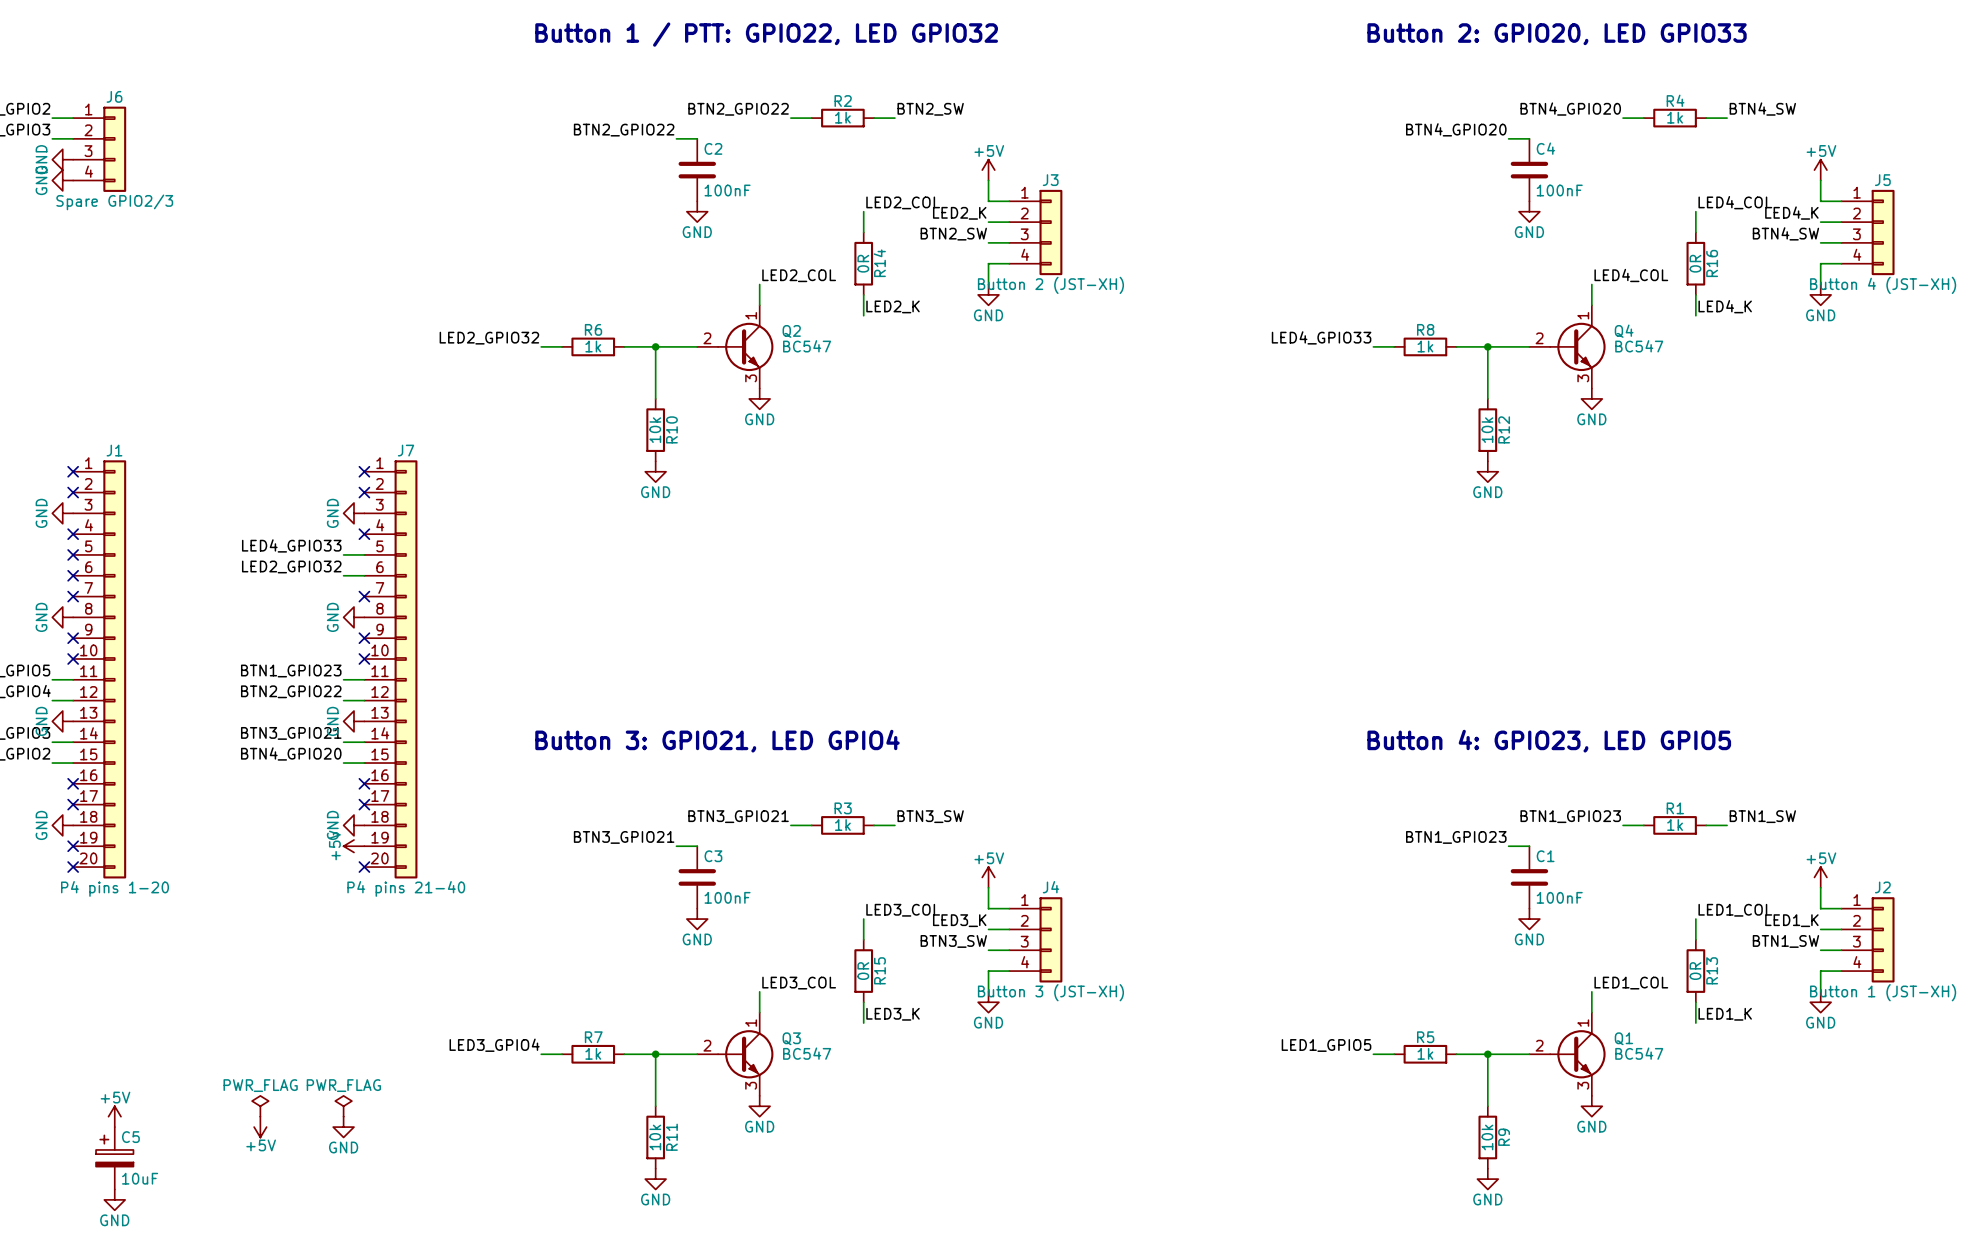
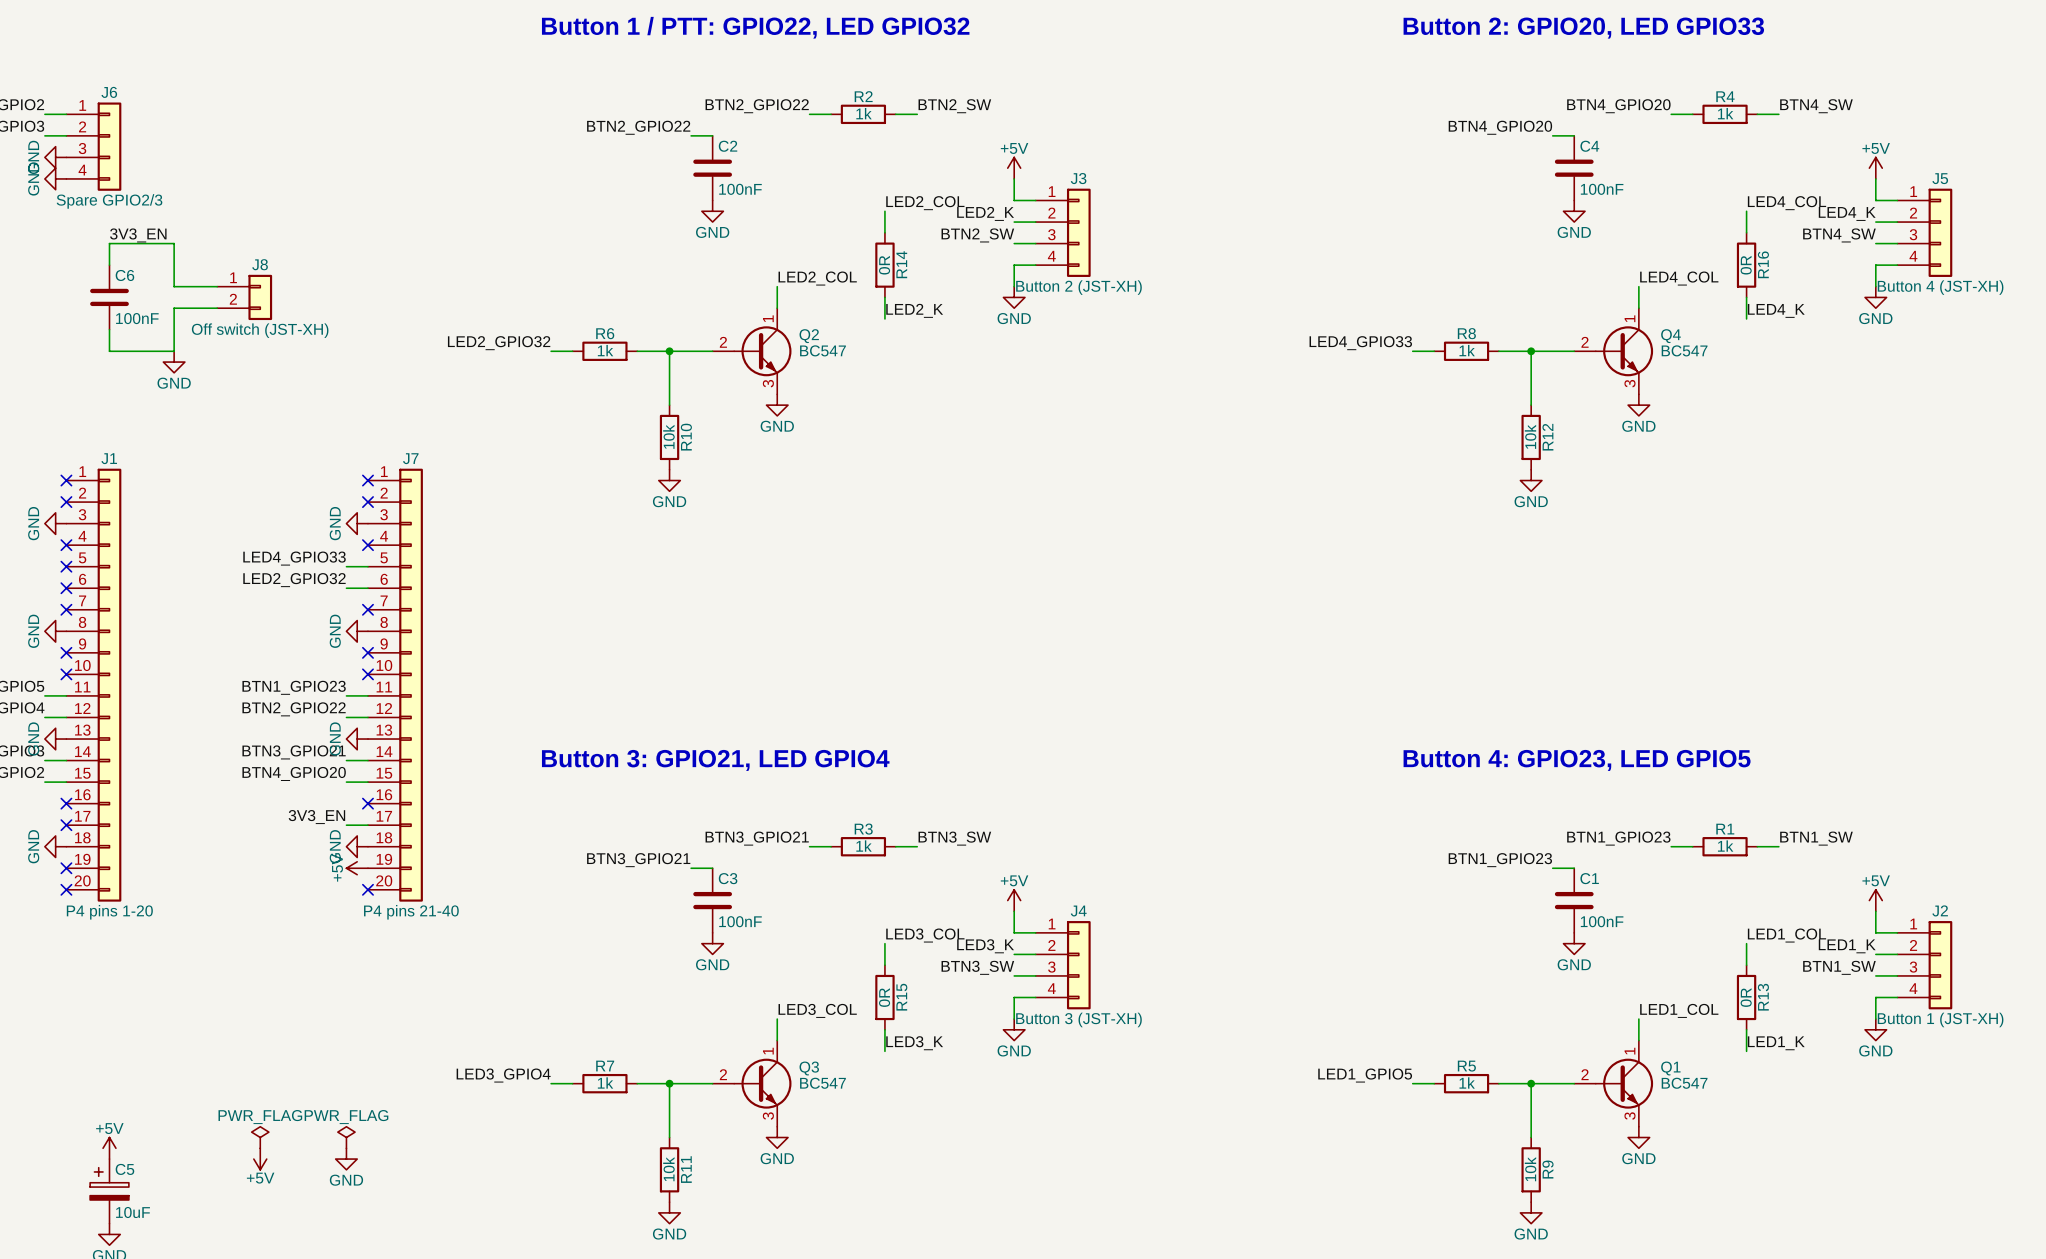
label: none -> 3V3_EN (138, 235)
wire: none -> (109, 265) (109, 243) (174, 243) (174, 286) (217, 286)
C6: none -> 100nF (109, 297)
J8: none -> Off switch (JST-XH) (244, 297)
wire: none -> (217, 308) (174, 308) (174, 351) (109, 351) (109, 329)
power symbol: none -> GND (174, 362)
label: none -> 3V3_EN (316, 817)
wire: none -> (346, 825) (367, 825)
no-connect mark: (364, 804) -> none

